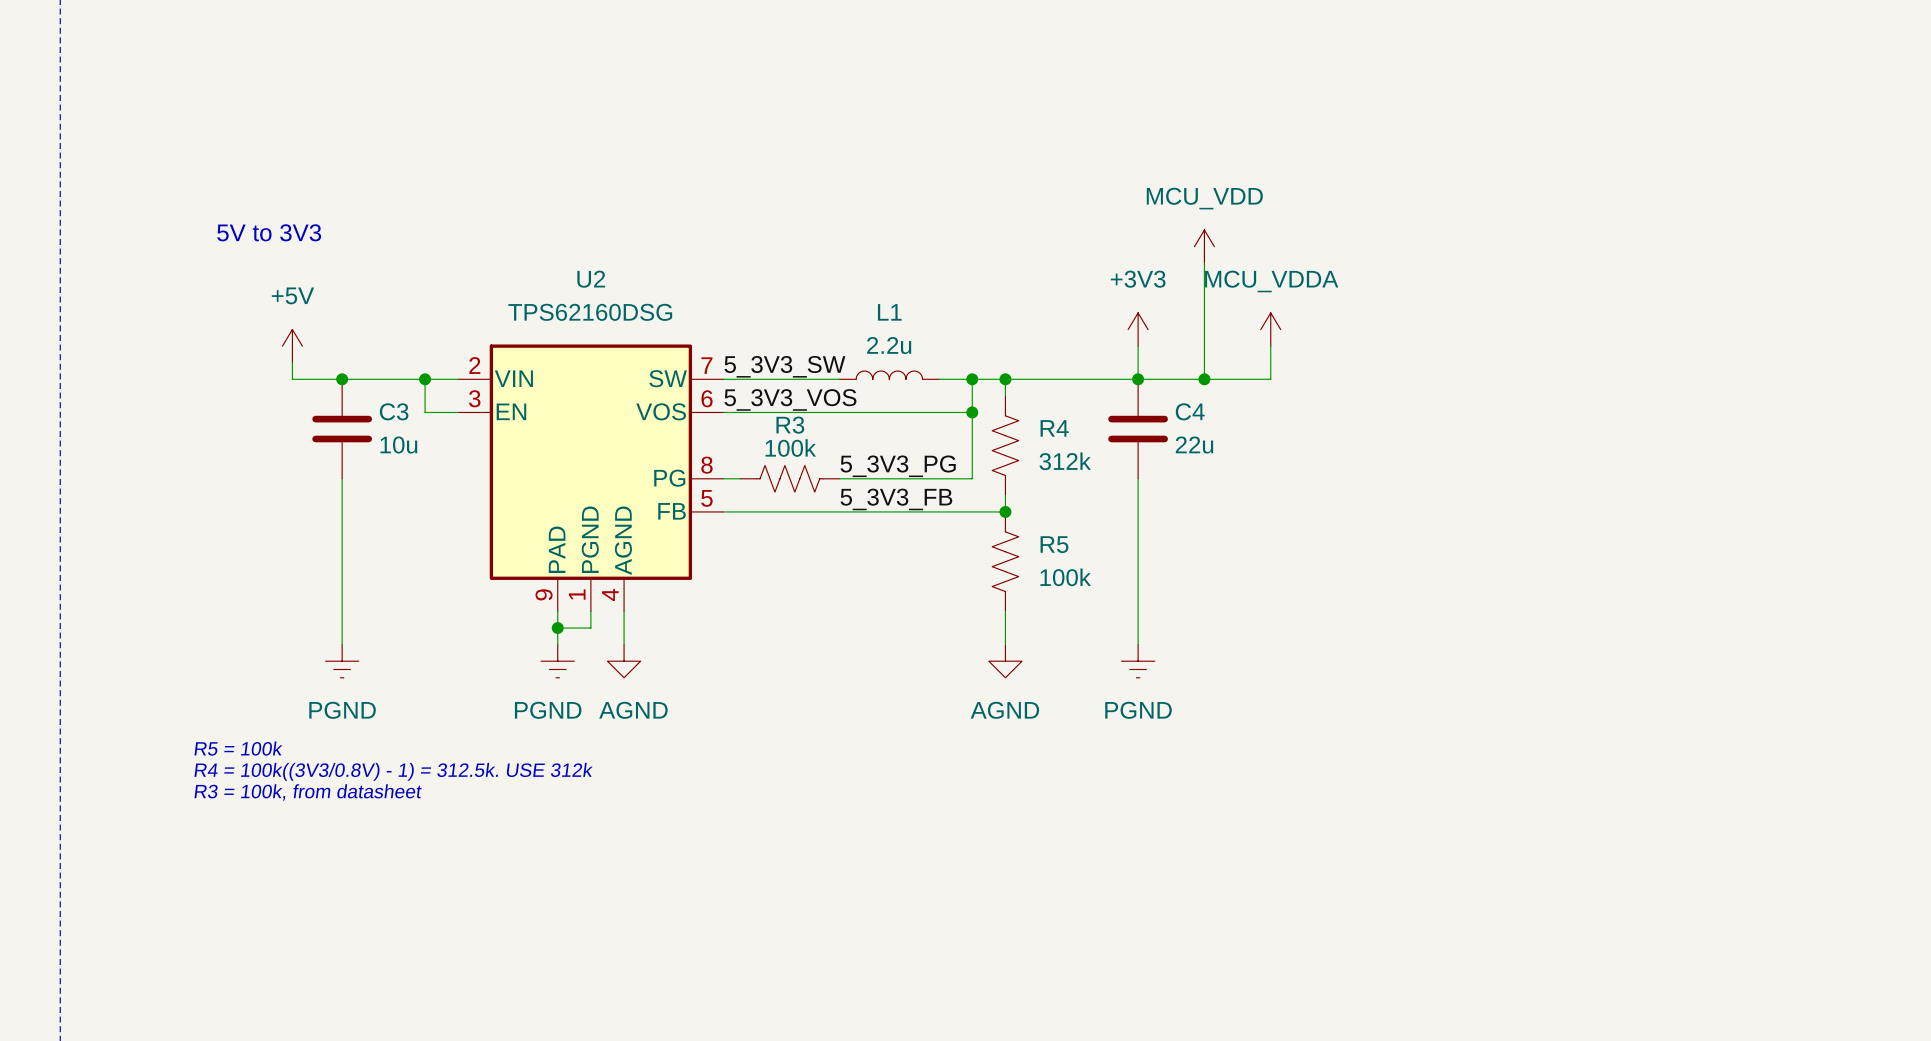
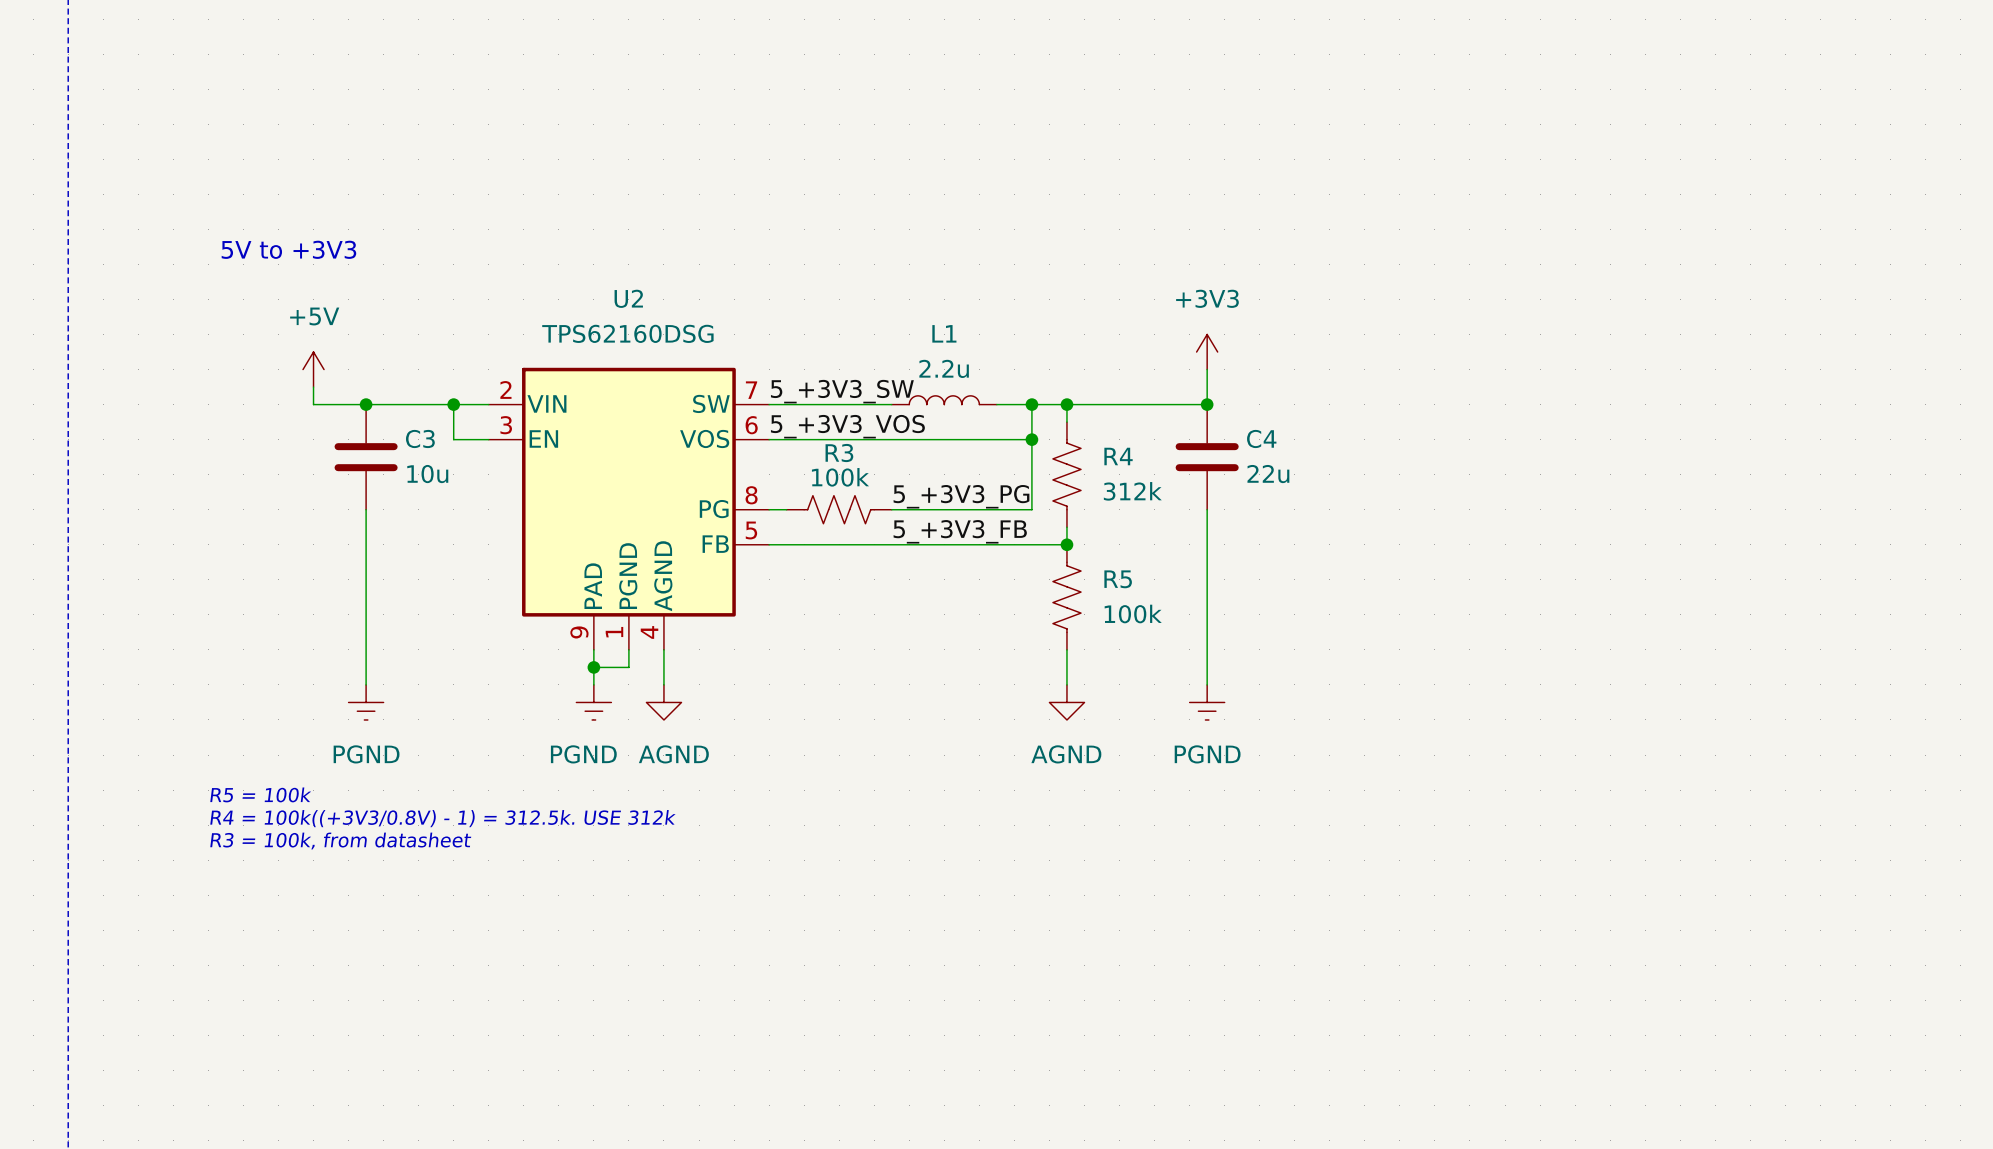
text: 5V to 3V3 (269, 232) -> 5V to +3V3 (288, 249)
power symbol: MCU_VDD (1204, 246) -> none
wire: (1204, 263) (1204, 379) -> none
power symbol: MCU_VDDA (1270, 329) -> none
wire: (1270, 346) (1270, 379) (1138, 379) -> none
label: 5_3V3_SW (784, 366) -> 5_+3V3_SW (842, 391)
junction: (1204, 379) -> none
label: 5_3V3_VOS (790, 399) -> 5_+3V3_VOS (847, 426)
label: 5_3V3_PG (898, 466) -> 5_+3V3_PG (961, 496)
label: 5_3V3_FB (896, 499) -> 5_+3V3_FB (960, 531)
text: R4 = 100k((3V3/0.8V) - 1) = 312.5k. USE 312k (393, 771) -> R4 = 100k((+3V3/0.8V) - 1) = 312.5k. USE 312k (442, 818)

